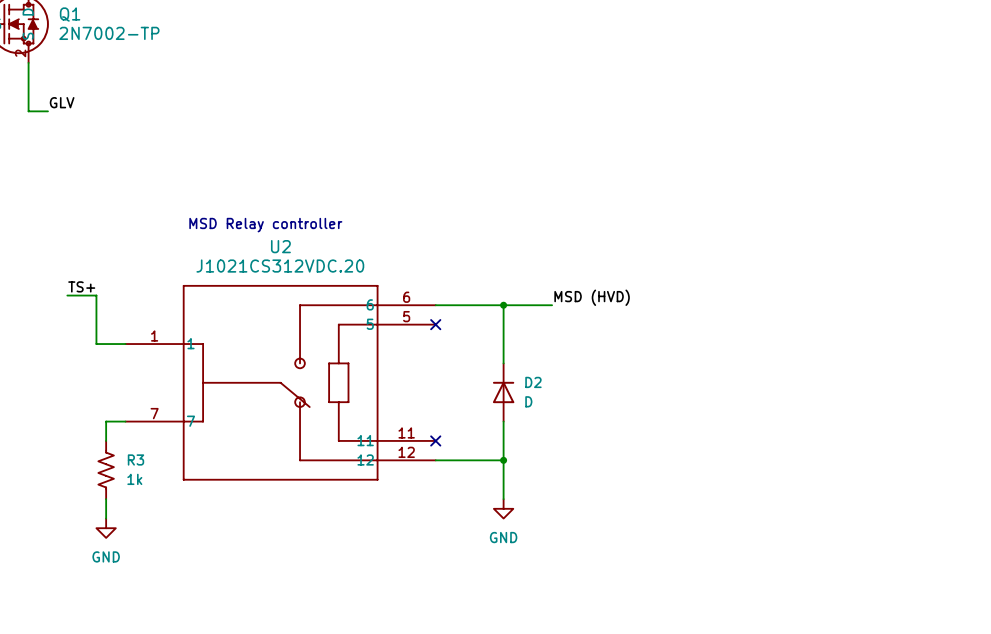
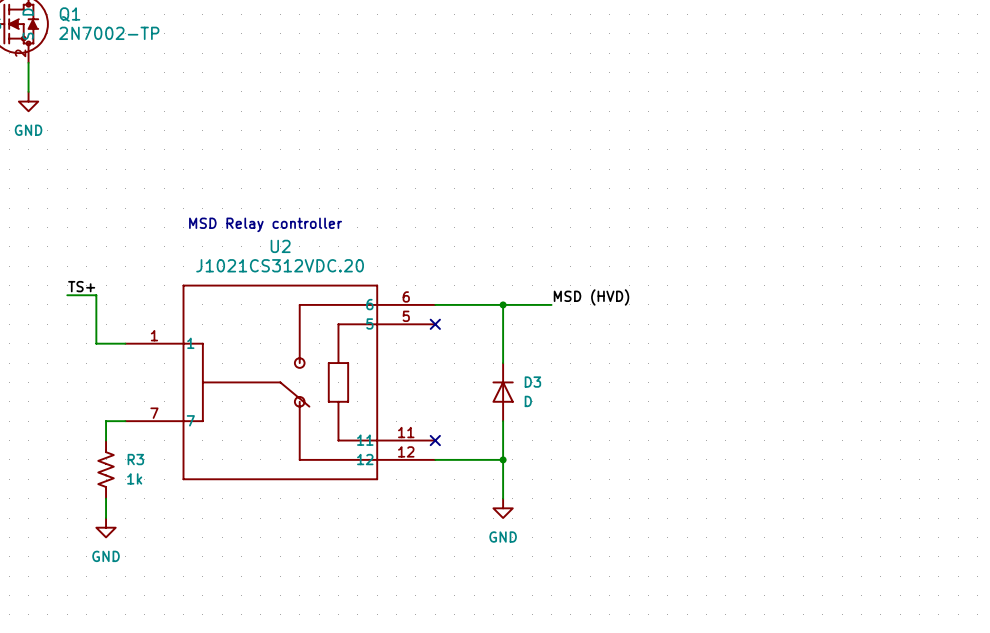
wire: (28, 91) (28, 111) (47, 111) -> none
power symbol: none -> GND (28, 101)
label: GLV (62, 102) -> none
D2 name: D2 (533, 382) -> D3 (532, 382)

